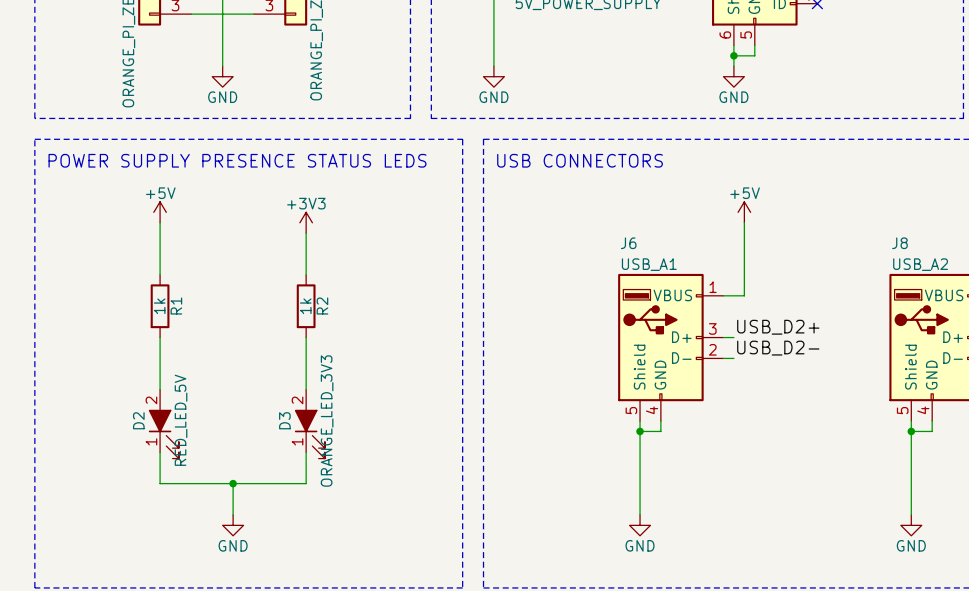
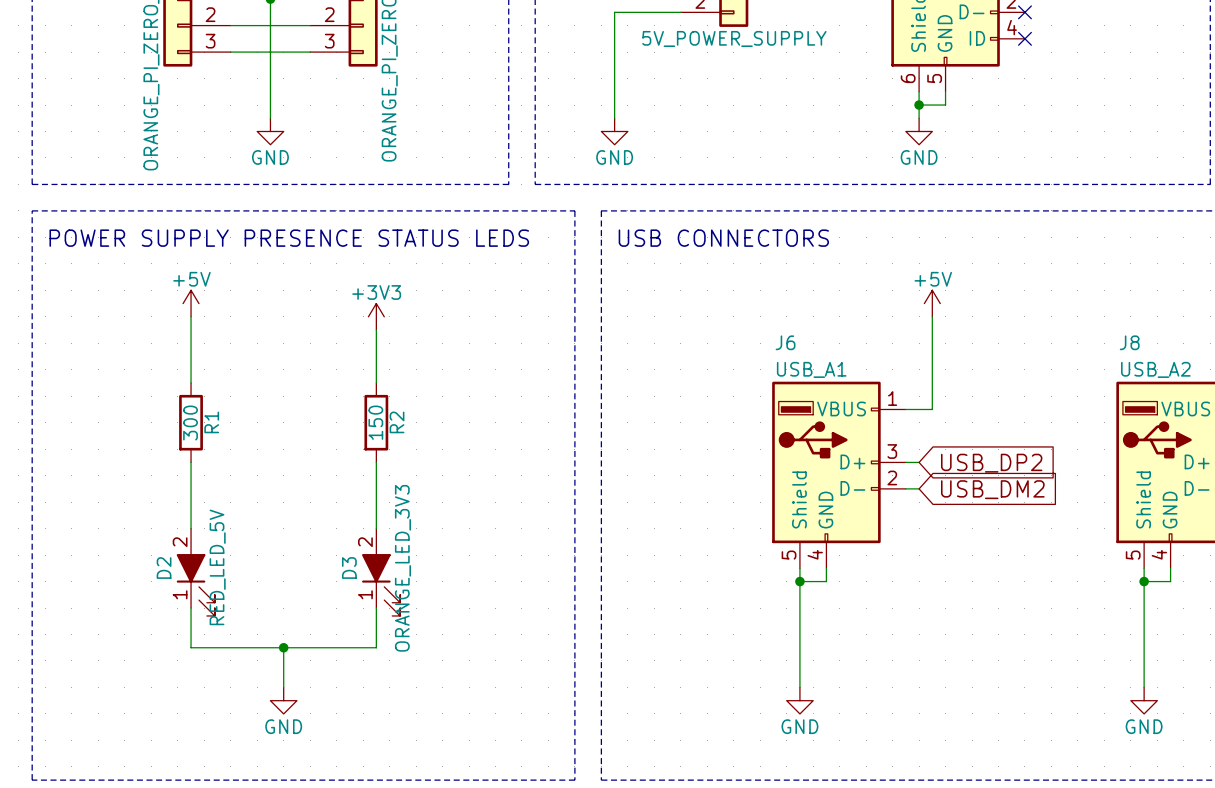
R1 value: 1k (159, 306) -> 300 (190, 423)
R2 value: 1k (305, 306) -> 150 (375, 422)
label: USB_D2+ (778, 327) -> none
global label: none -> USB_DP2 (991, 463)
label: USB_D2- (778, 348) -> none
global label: none -> USB_DM2 (992, 489)

